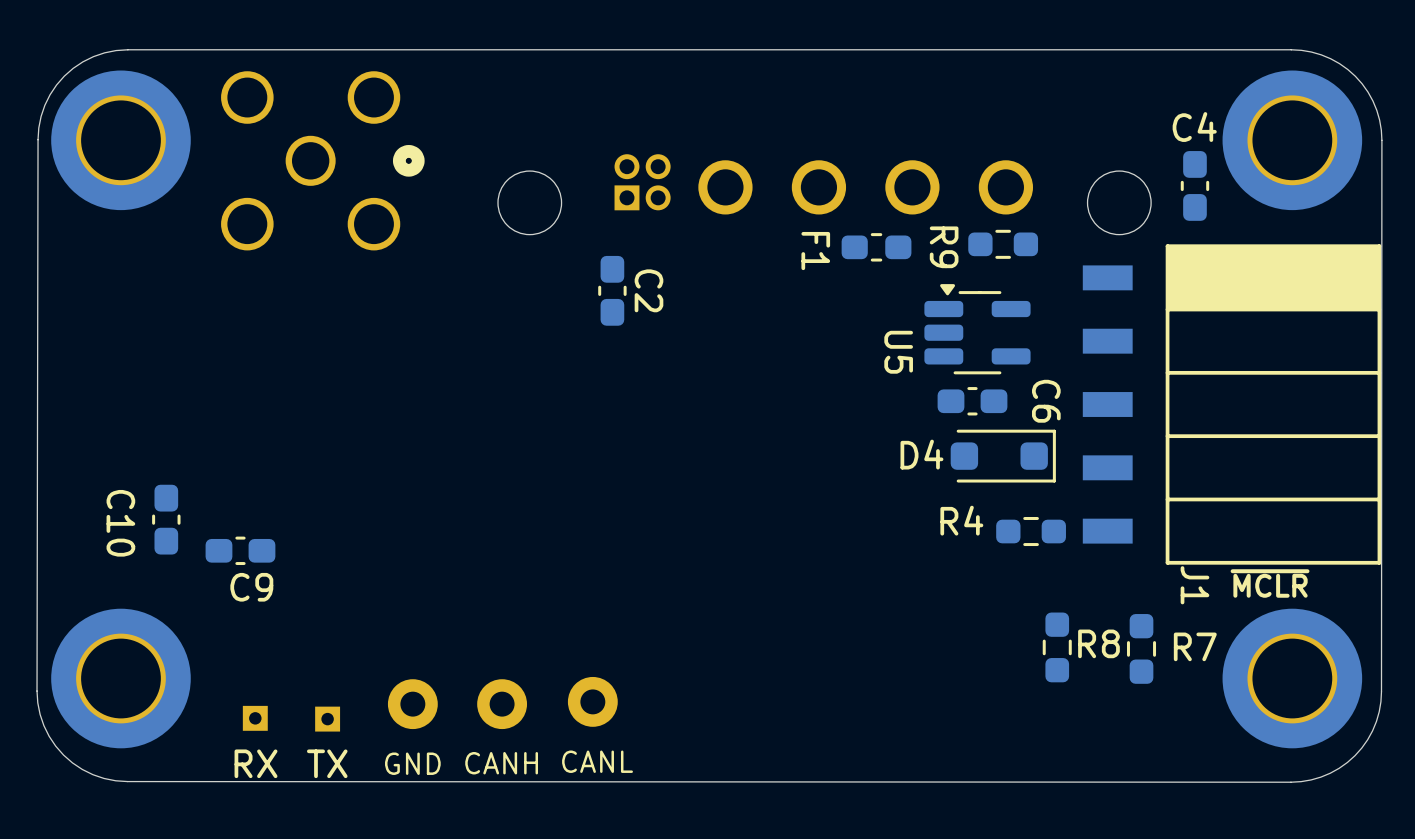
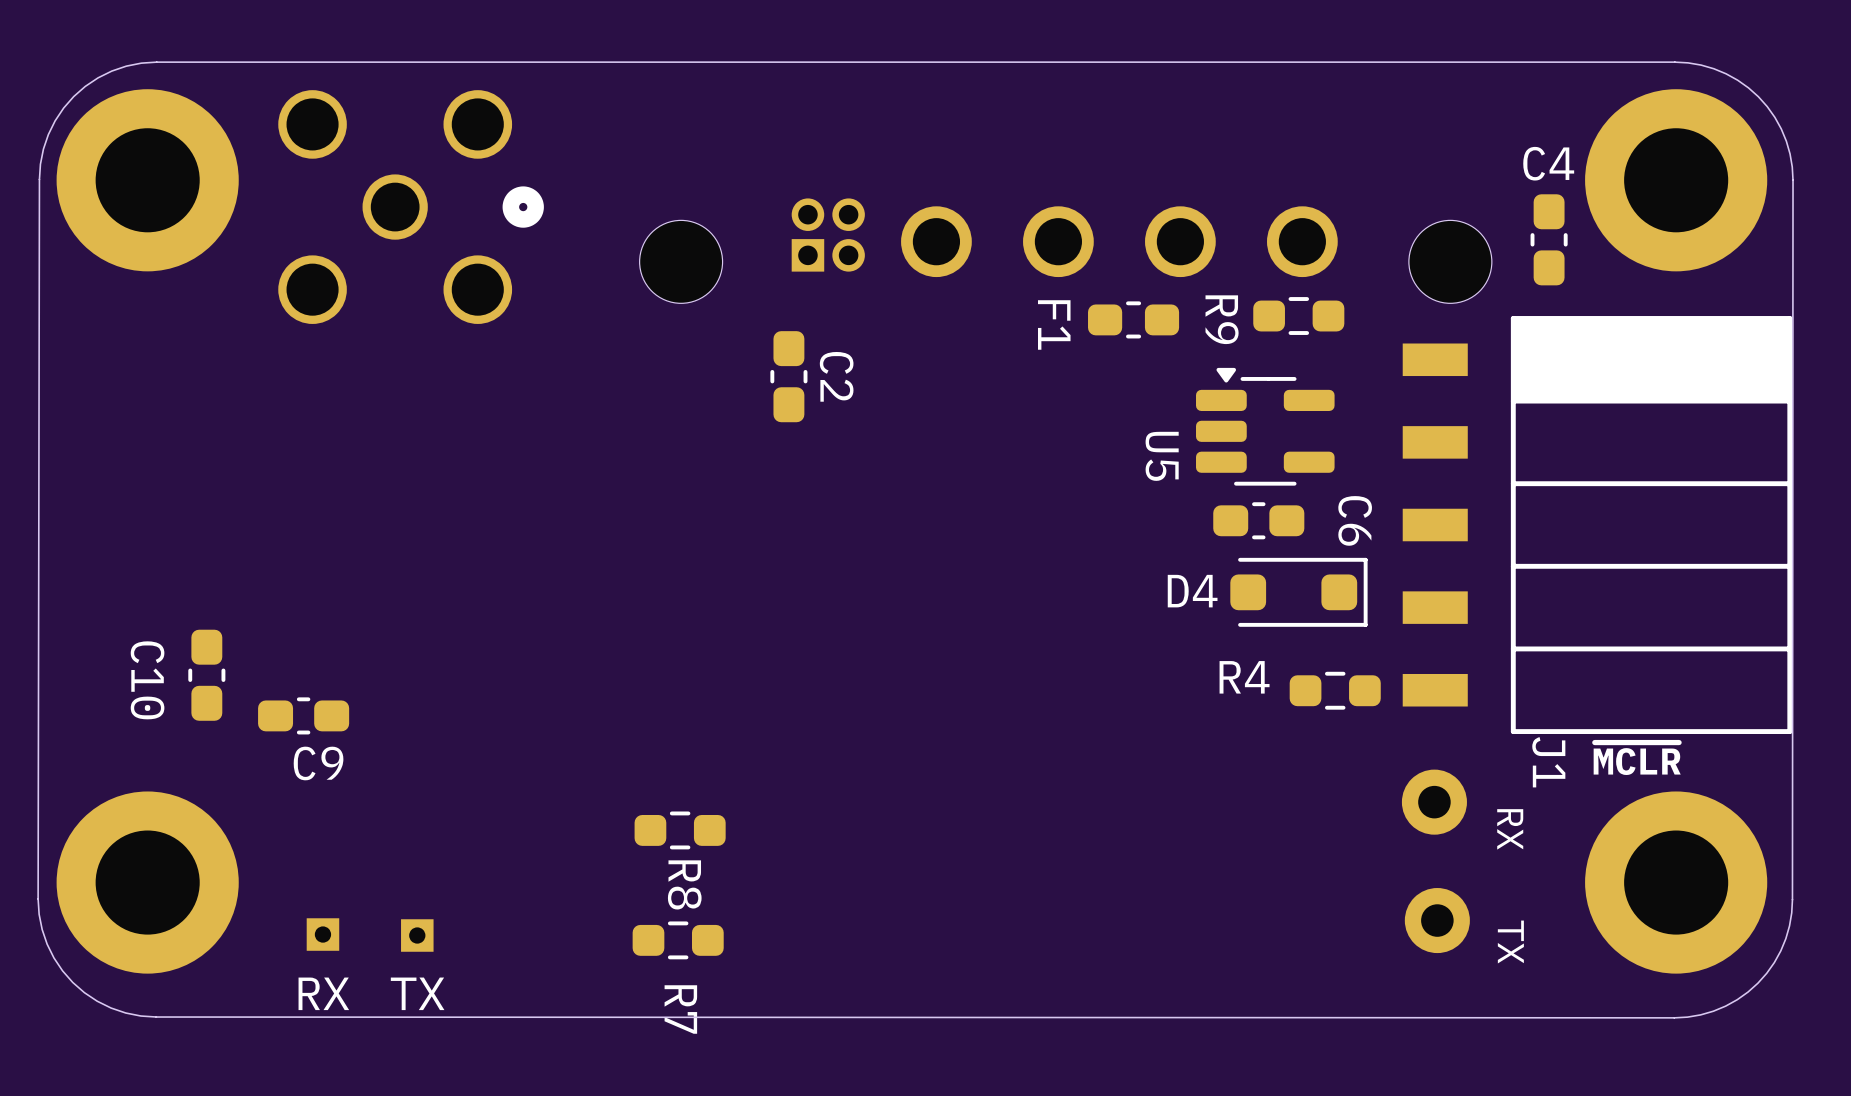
part: none -> (1434, 802)
text: none -> RX (1510, 829)
R8 rotation: 0° (1057, 647) -> 90° clockwise (680, 830)
R8 position: (1057, 647) -> (680, 830)
R7 rotation: 0° (1141, 648) -> 90° clockwise (678, 940)
R7 position: (1141, 648) -> (678, 940)
part: (592, 701) -> none
part: (412, 704) -> none
part: (502, 704) -> none
part: none -> (1437, 920)
text: none -> TX (1510, 942)
text: CANL (597, 761) -> none
text: GND (412, 763) -> none
text: CANH (501, 763) -> none

